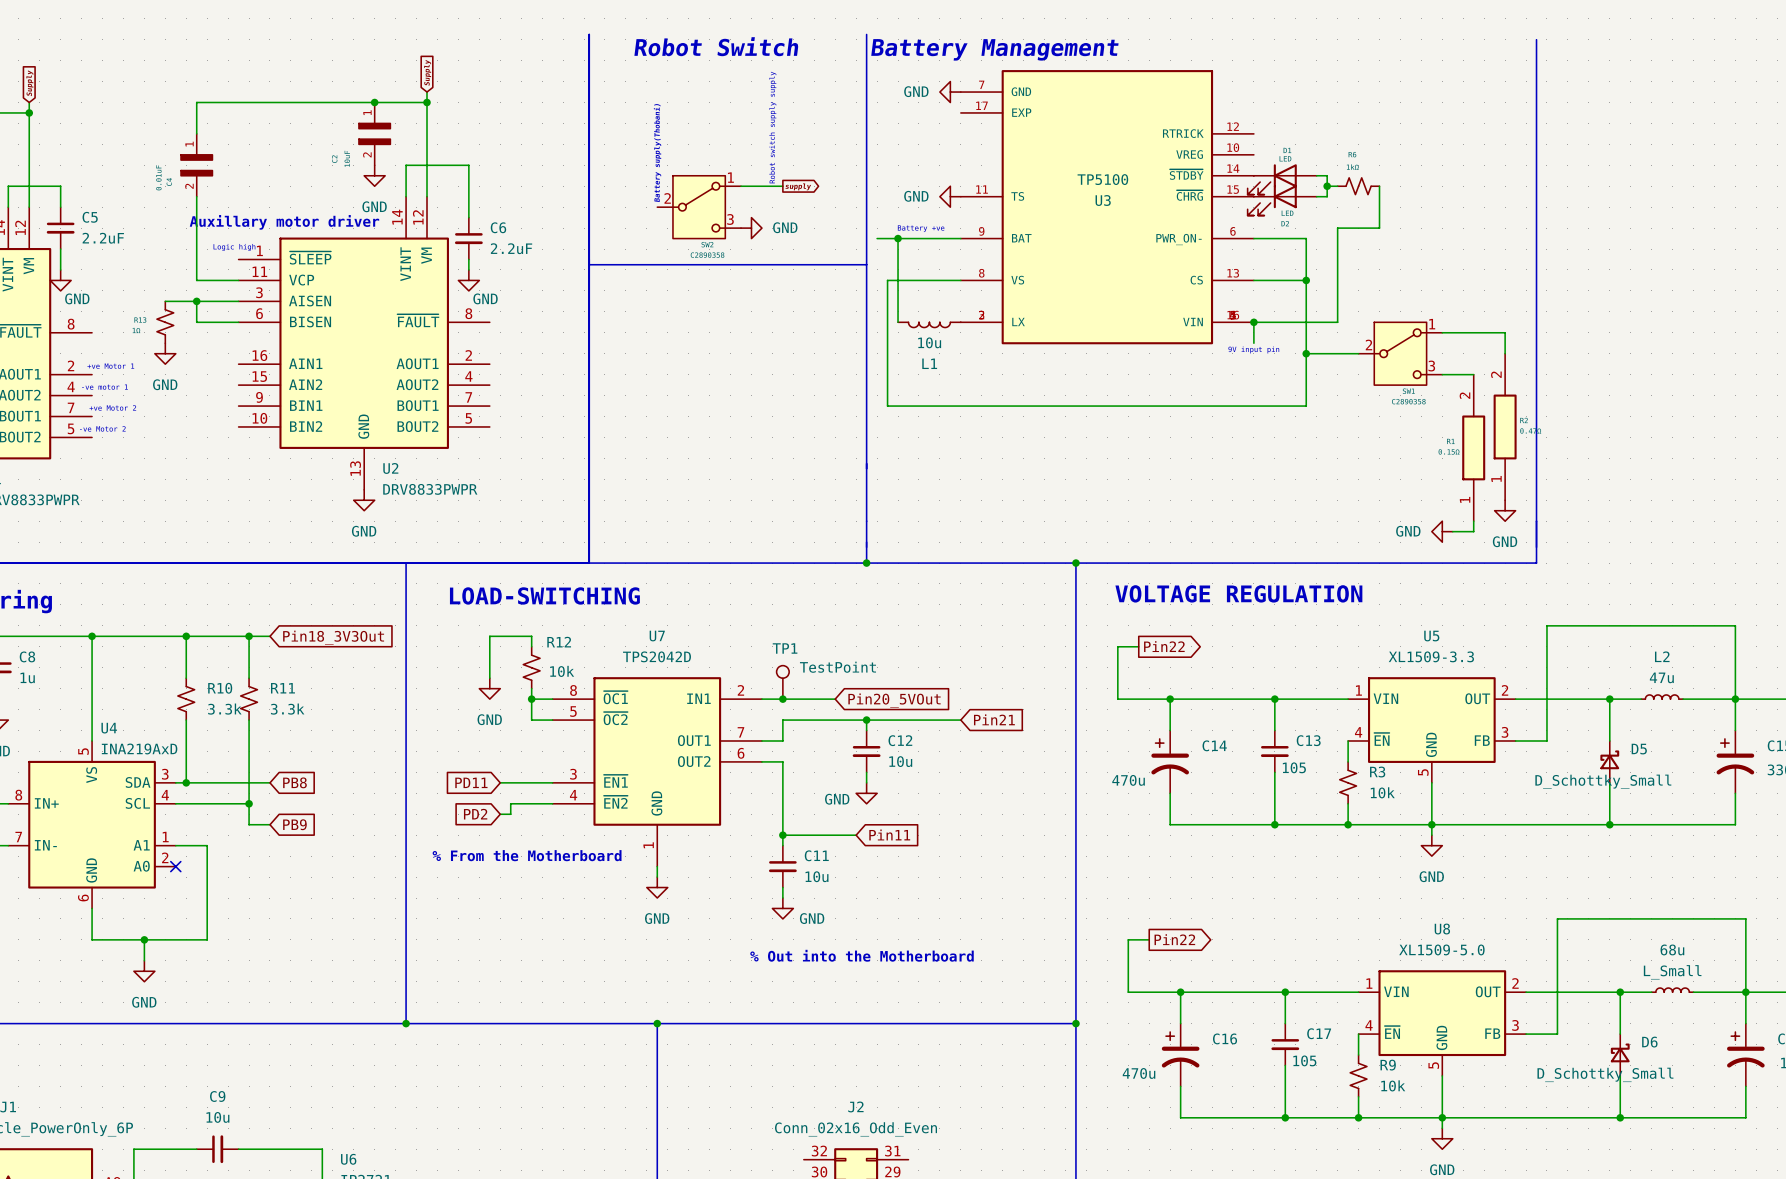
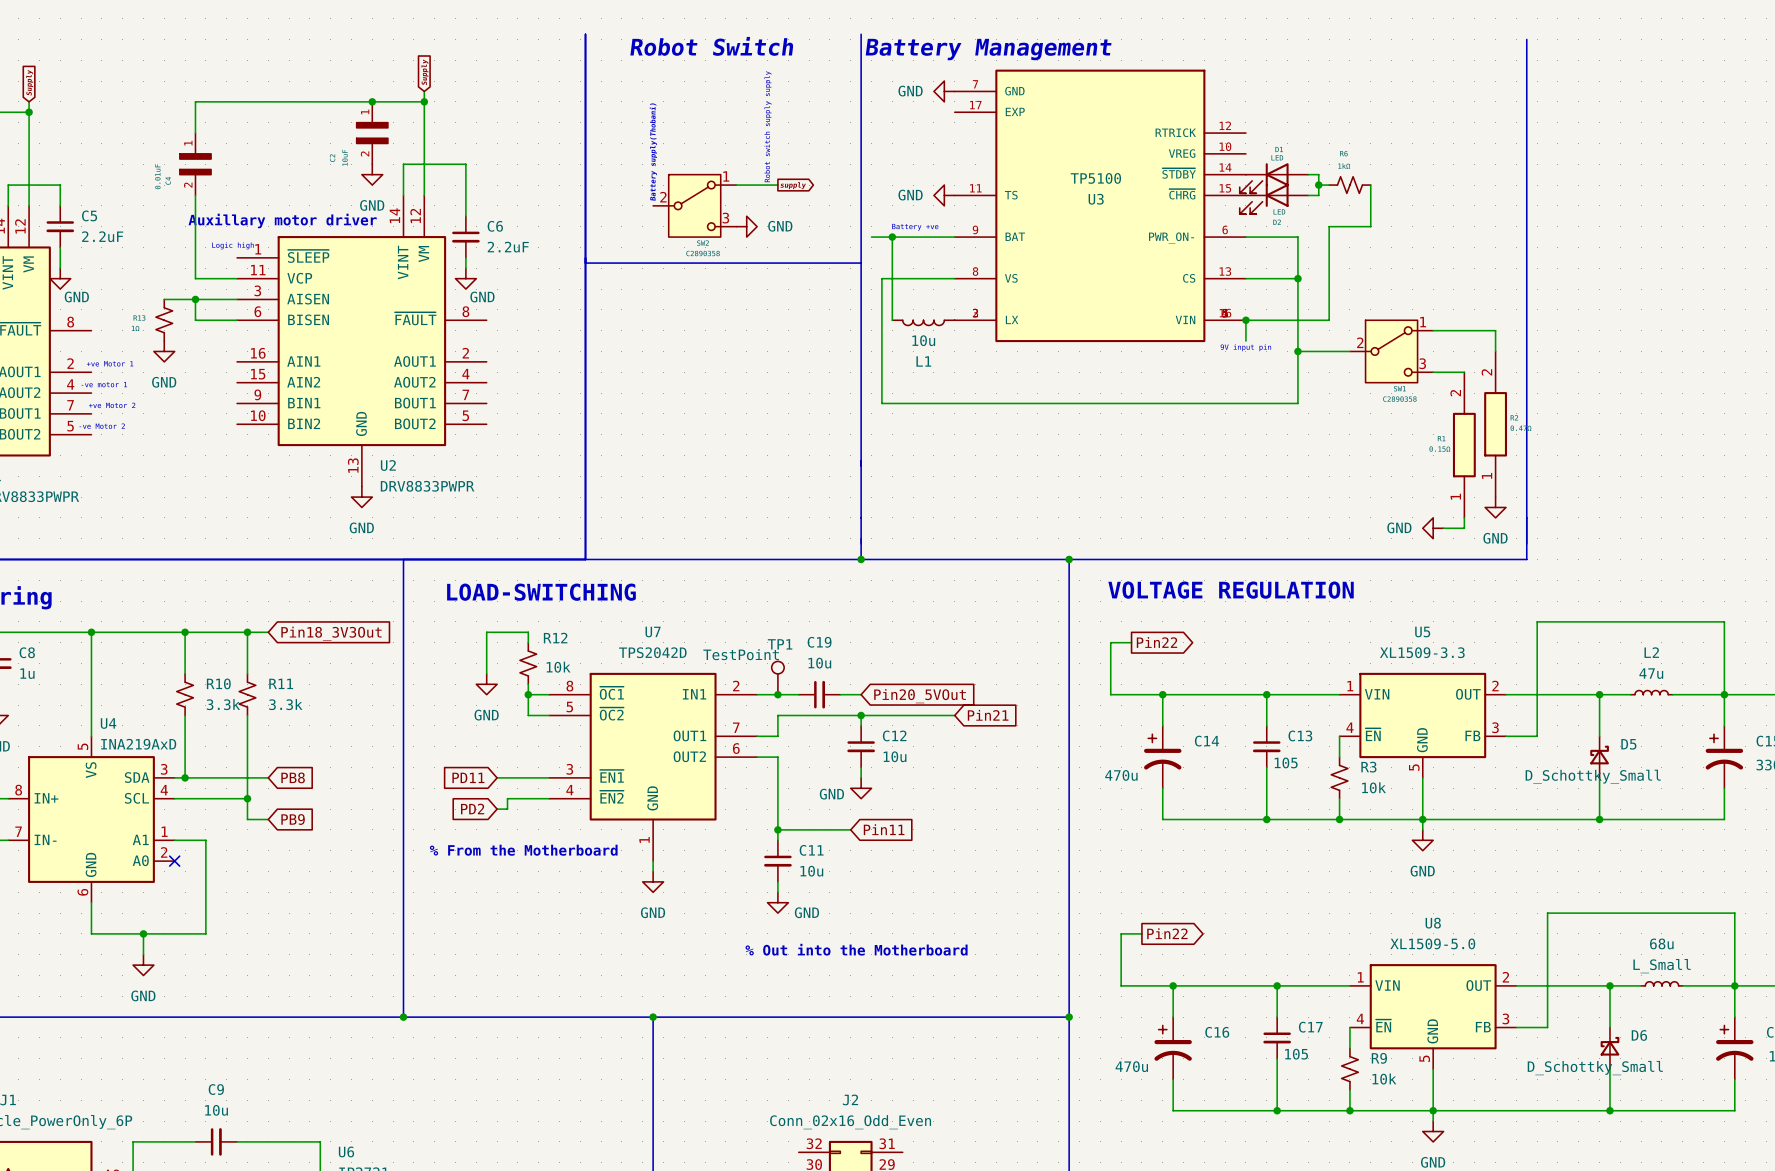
TP1 value position: TestPoint (837, 667) -> TestPoint (741, 654)
C19: none -> 10u (819, 694)
wire: none -> (840, 694) (861, 694)
global label position: Pin20_5VOut (894, 700) -> Pin20_5VOut (920, 696)

